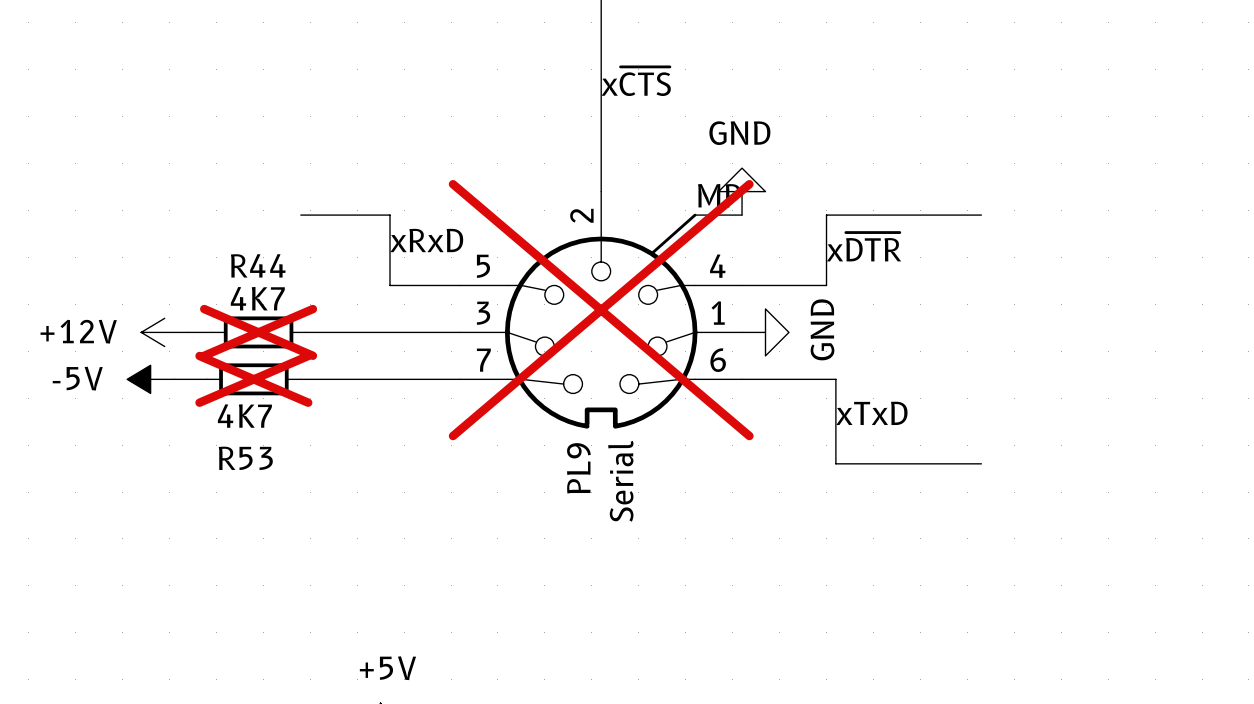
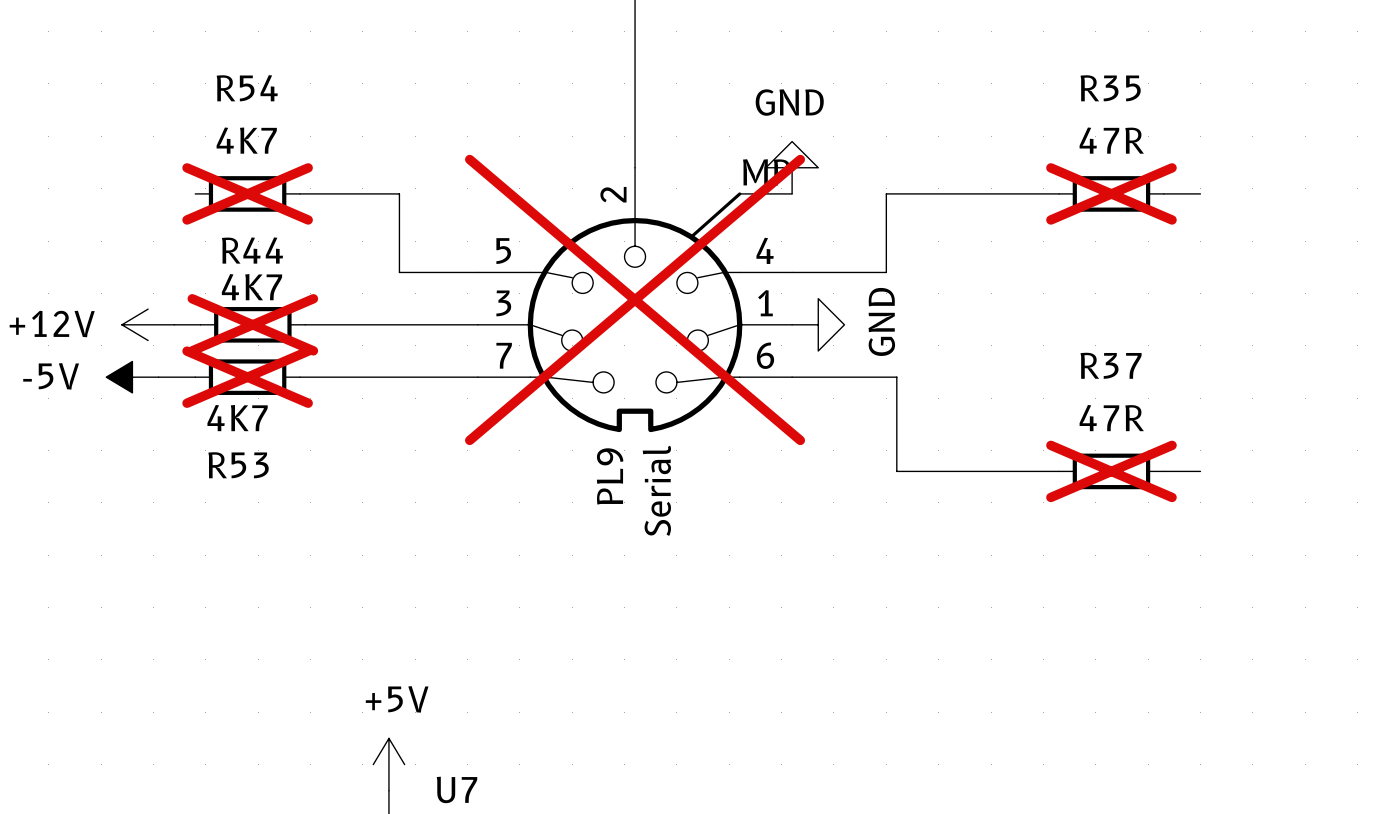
label: x~{CTS} (636, 81) -> none
R54: none -> 4K7 (247, 193)
R35: none -> 47R (1111, 193)
wire: none -> (1163, 193) (1200, 193)
label: xRxD (426, 240) -> none
label: x~{DTR} (864, 246) -> none
label: xTxD (871, 413) -> none
R37: none -> 47R (1111, 471)
wire: none -> (1163, 471) (1200, 471)

